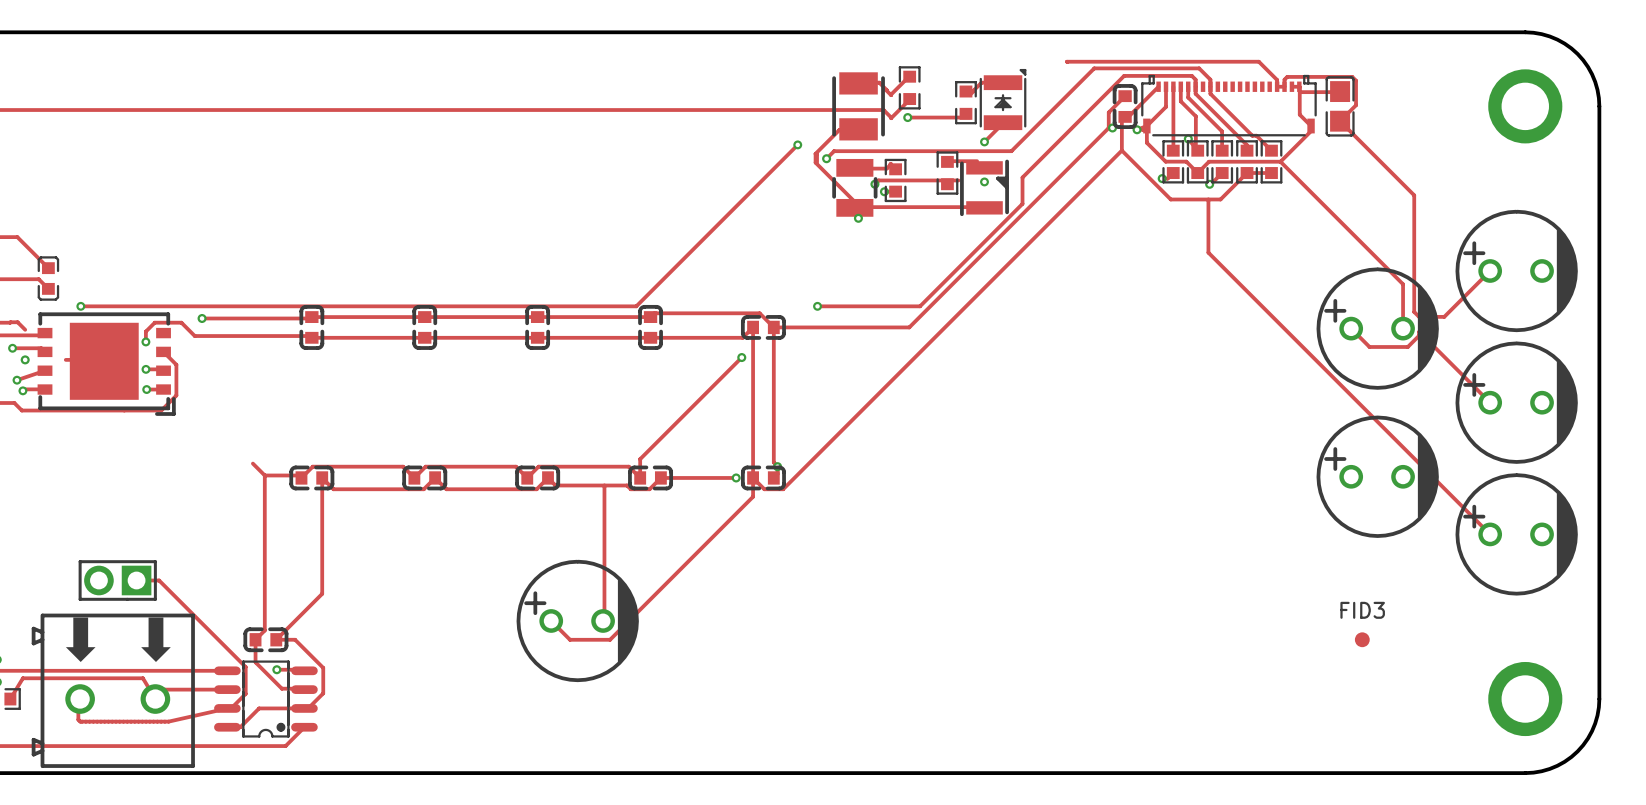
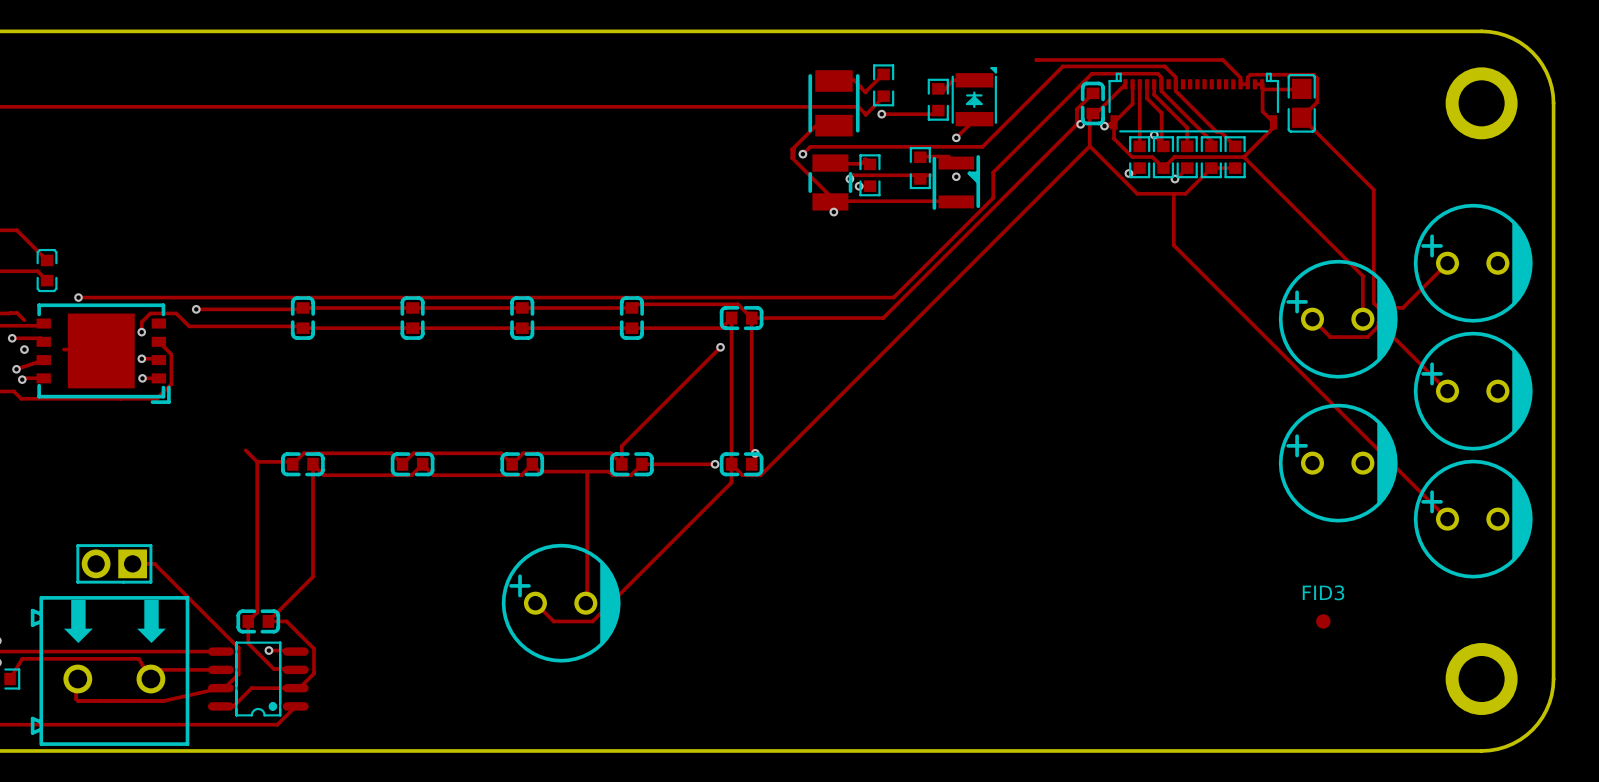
track: (797, 144) (636, 306) -> (794, 297) (618, 297)
via: (797, 144) -> none
via: (817, 306) -> none

